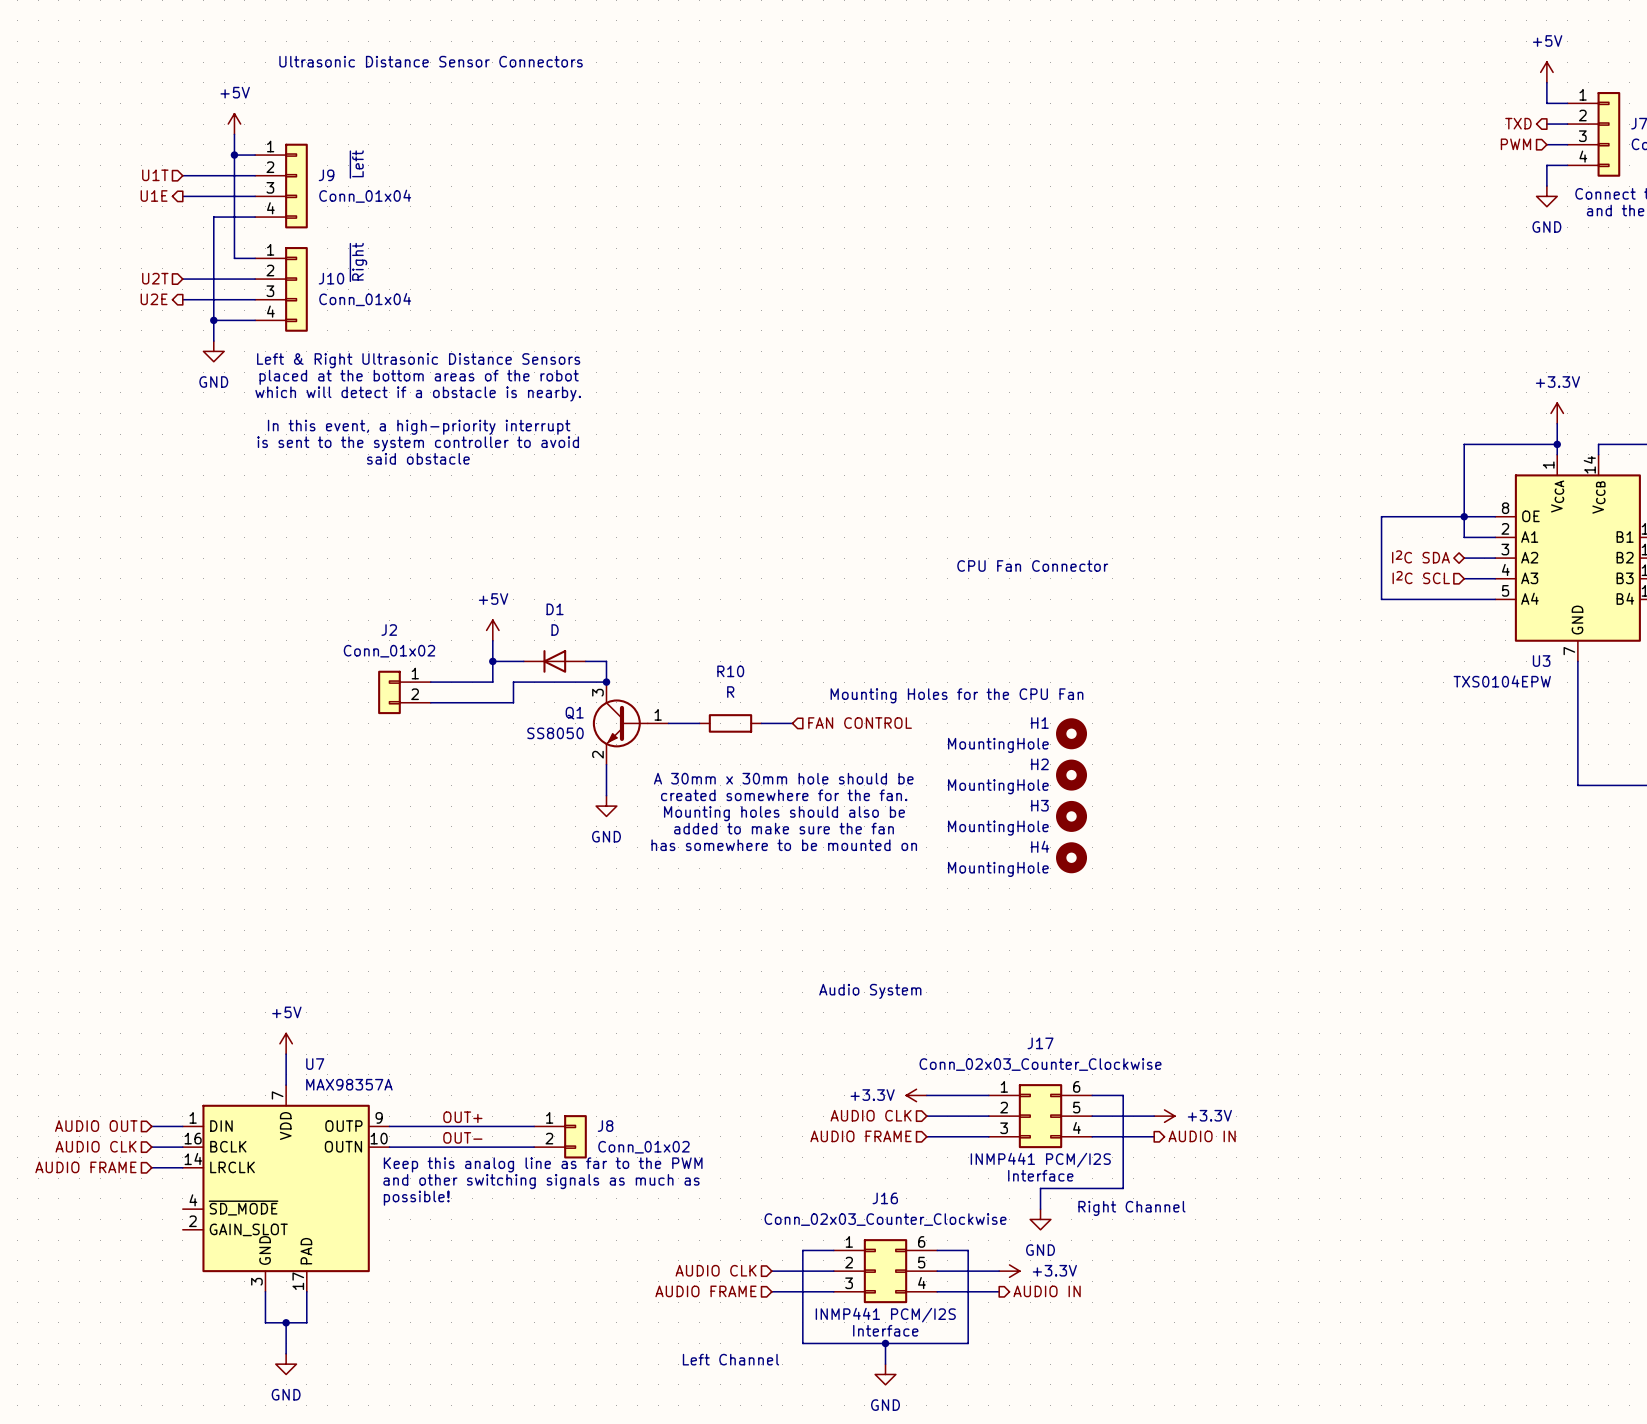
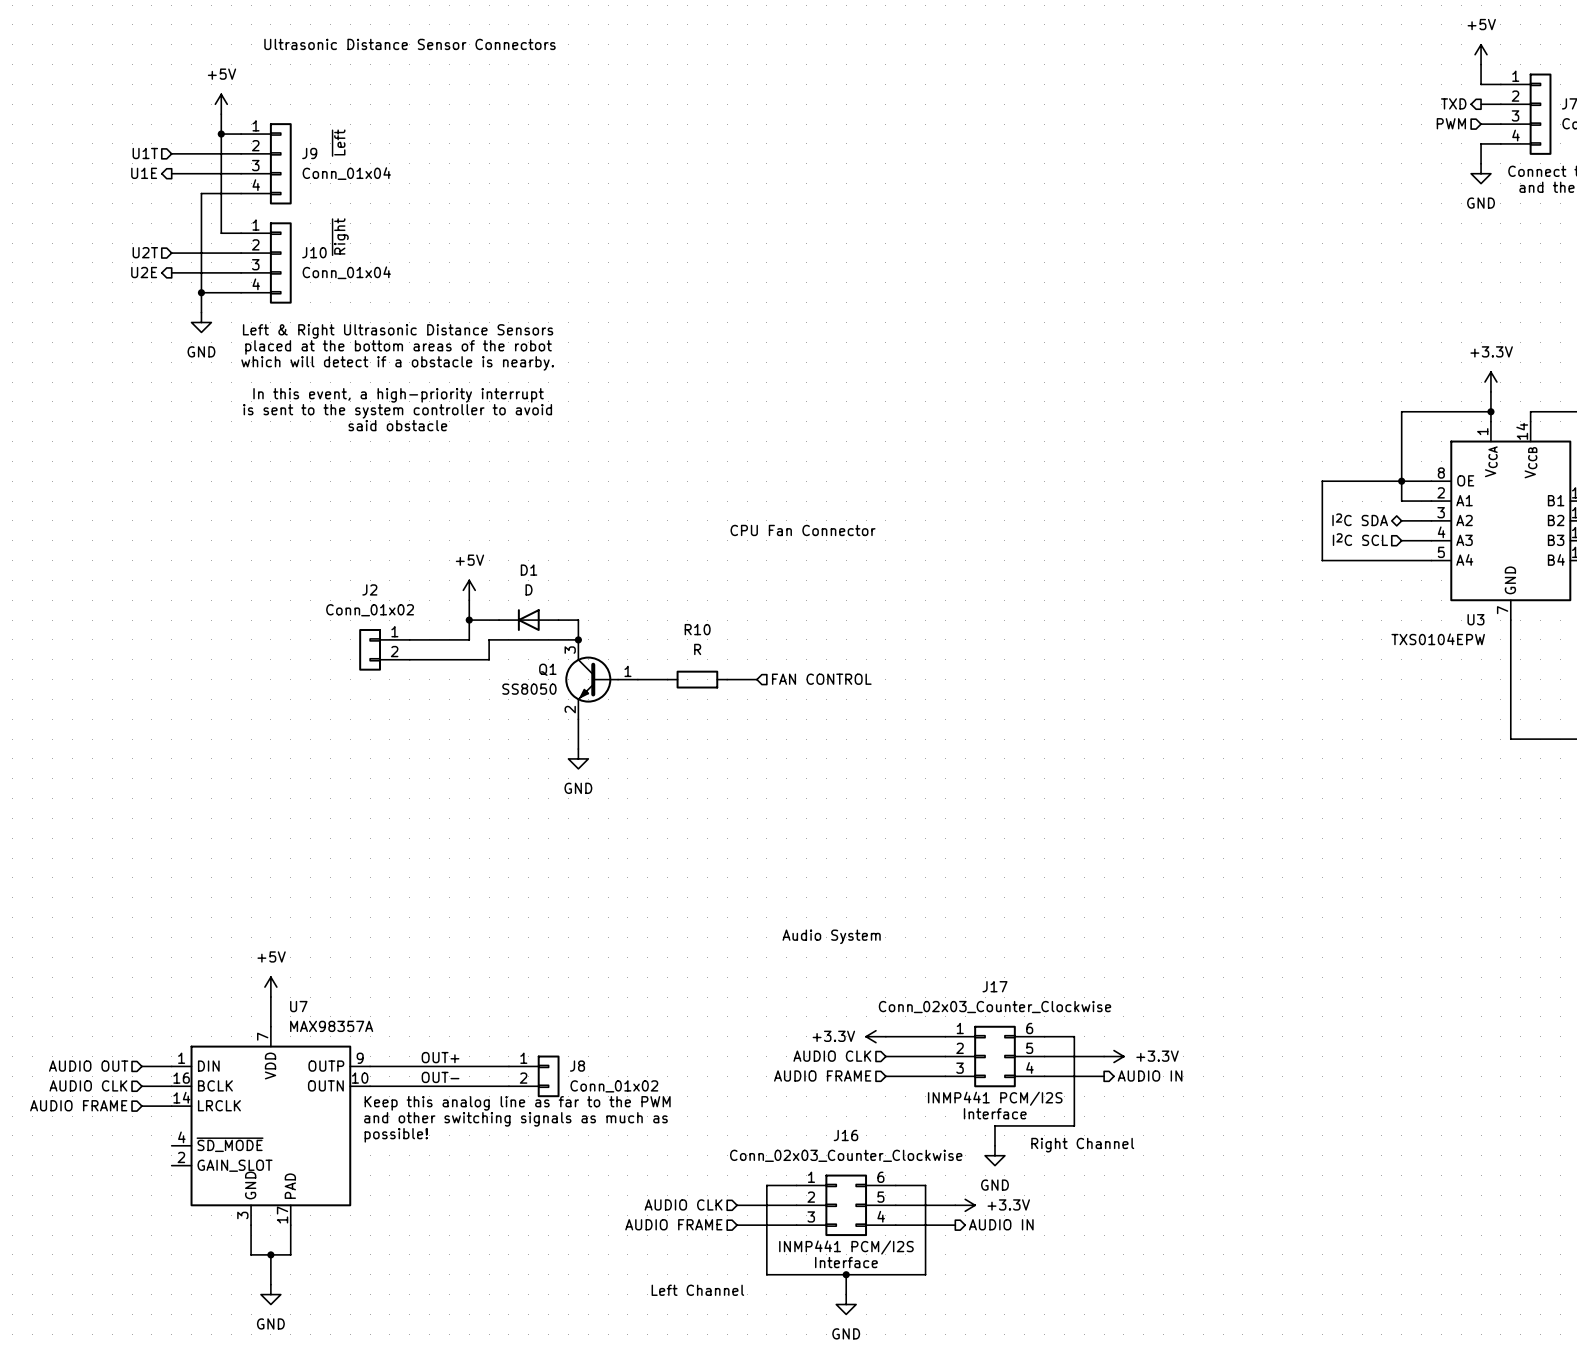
text position: CPU Fan Connector (1032, 565) -> CPU Fan Connector (803, 530)
text: Mounting Holes for the CPU Fan (956, 695) -> none
H1: MountingHole (1071, 733) -> none
H2: MountingHole (1071, 775) -> none
text: A 30mm x 30mm hole should be (783, 778) -> none
text: created somewhere for the fan. (784, 795) -> none
text: Mounting holes should also be (784, 813) -> none
H3: MountingHole (1071, 816) -> none
text: added to make sure the fan (783, 828) -> none
text: has somewhere to be mounted on (784, 845) -> none
H4: MountingHole (1071, 857) -> none

